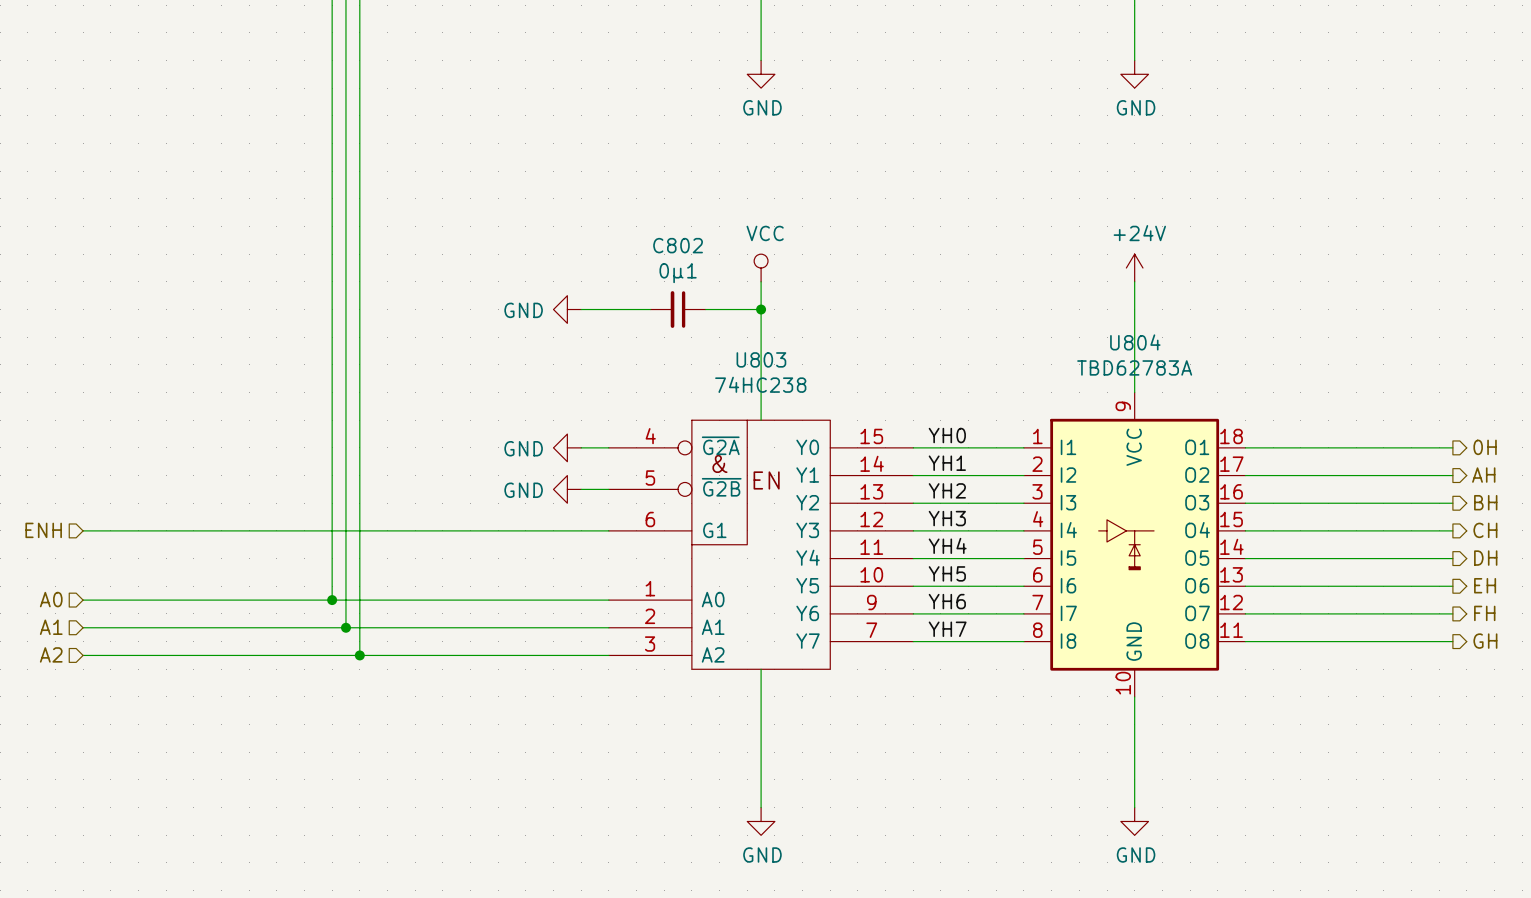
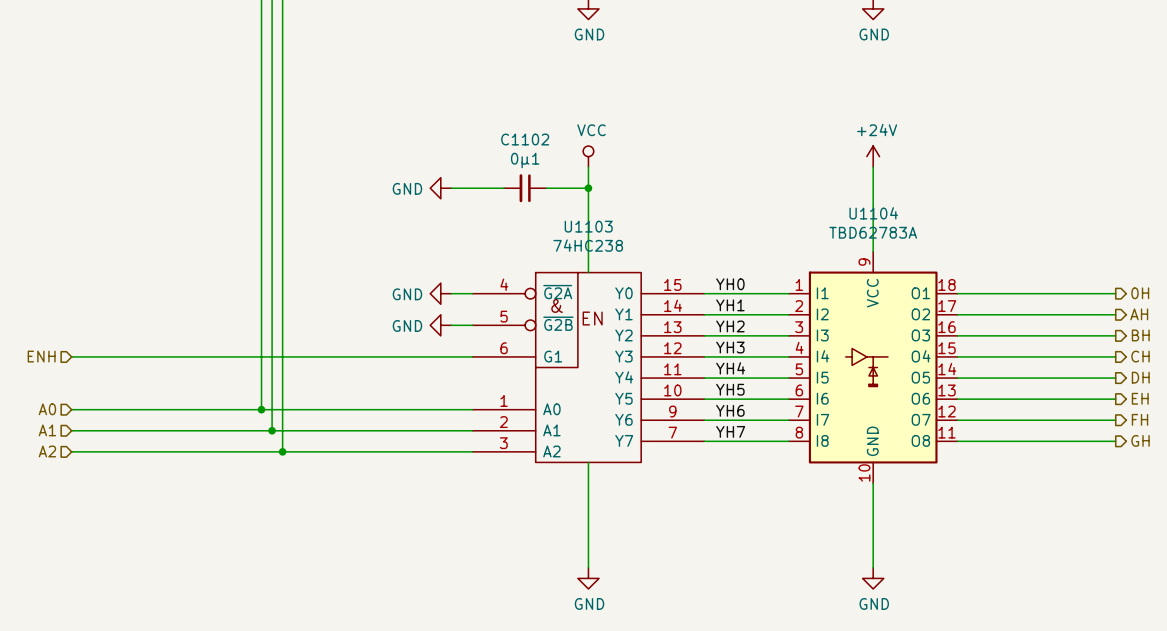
C802 name: C802 (678, 245) -> C1102 (525, 139)
U804 name: U804 (1135, 342) -> U1104 (873, 213)
U803 name: U803 (761, 359) -> U1103 (588, 226)

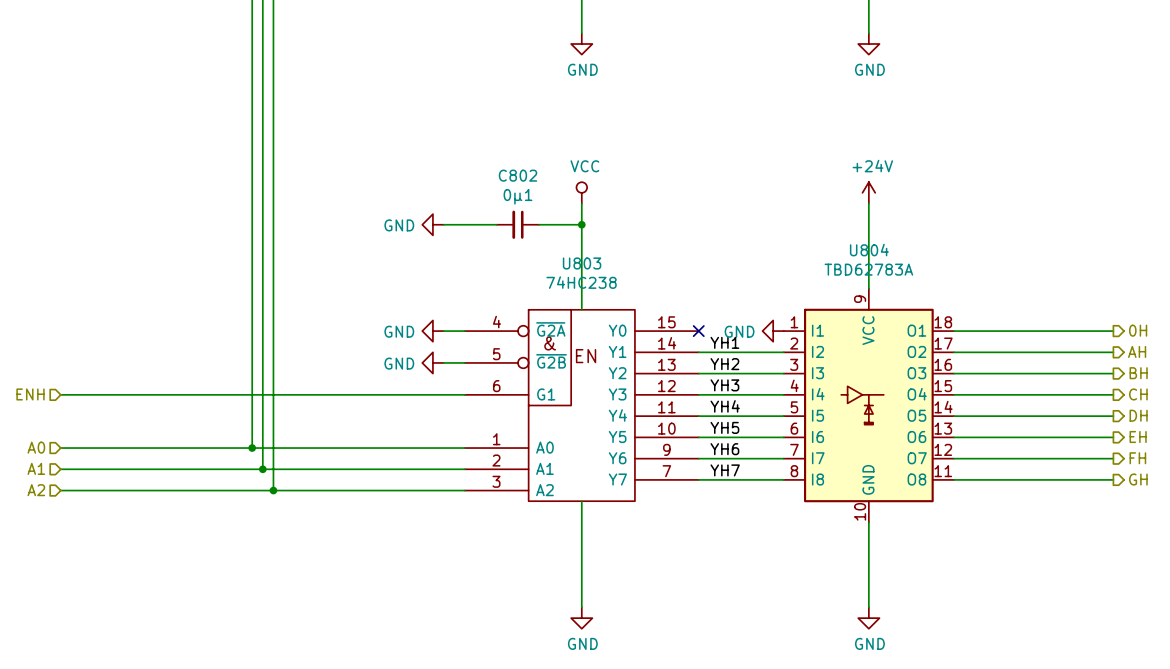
C1102 name: C1102 (525, 139) -> C802 (518, 175)
U1104 name: U1104 (873, 213) -> U804 (869, 250)
U1103 name: U1103 (588, 226) -> U803 (582, 263)
label: YH0 (730, 284) -> none
wire: (704, 293) (788, 293) -> none
no-connect mark: none -> (698, 331)
power symbol: none -> GND (773, 331)

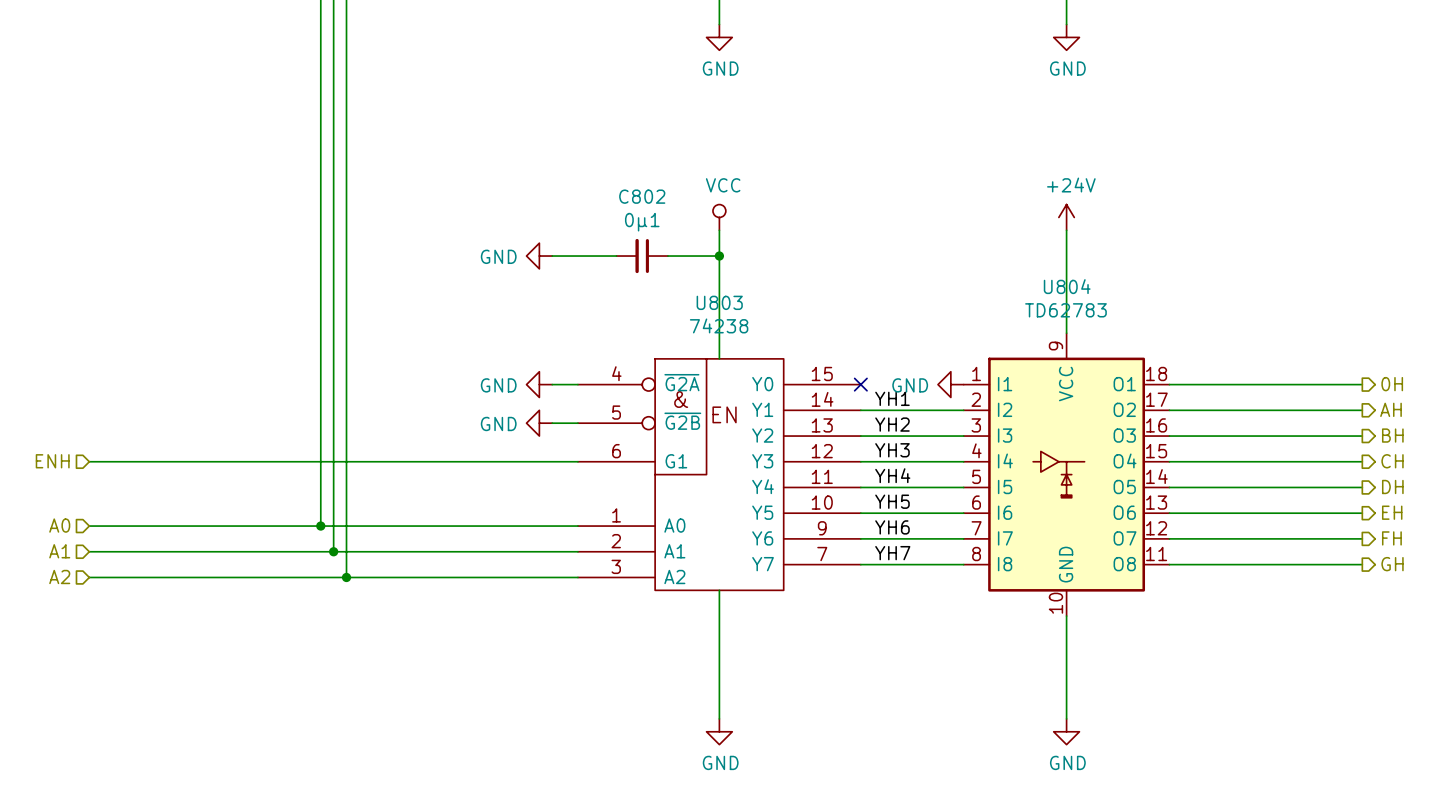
U804 value: TBD62783A (868, 269) -> TD62783 (1065, 310)
U803 value: 74HC238 (581, 282) -> 74238 (719, 325)

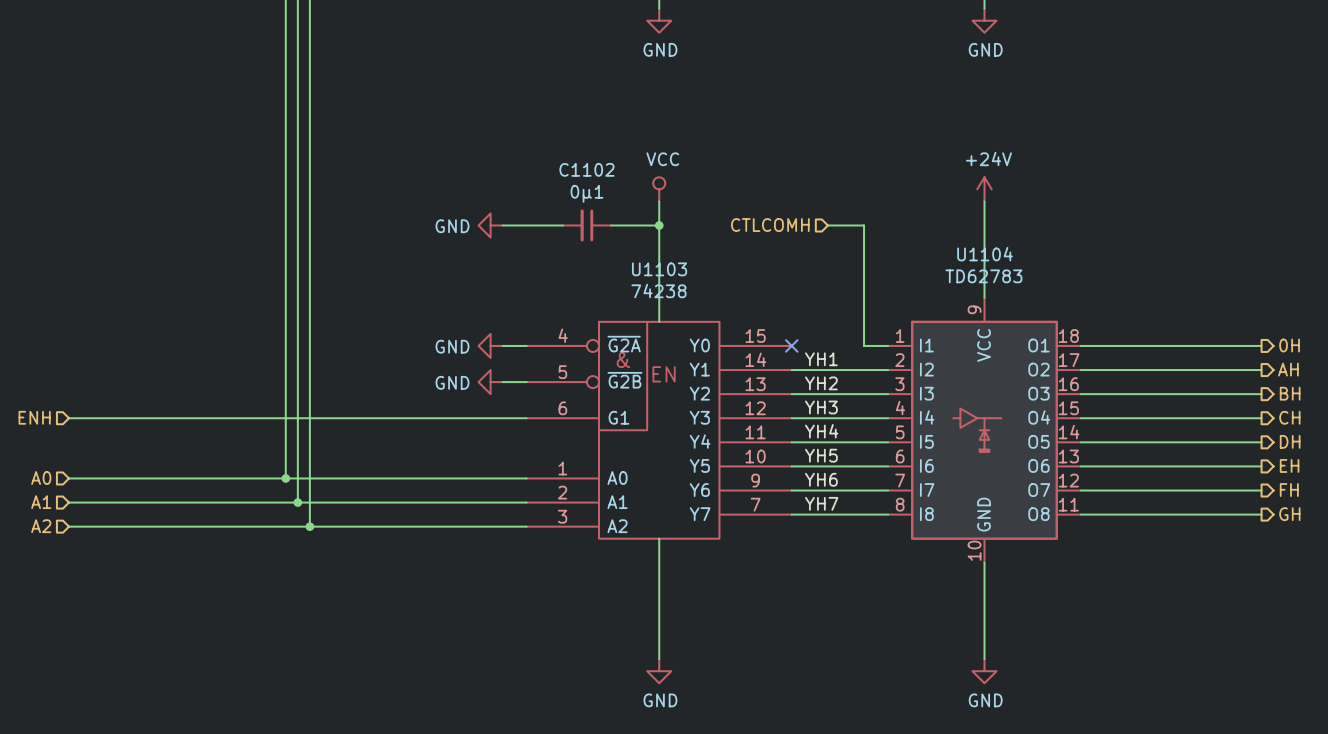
C802 name: C802 (642, 196) -> C1102 (586, 169)
hierarchical label: none -> CTLCOMH (770, 225)
wire: none -> (827, 225) (864, 225) (864, 345) (888, 345)
U804 name: U804 (1067, 286) -> U1104 (985, 254)
U803 name: U803 (719, 302) -> U1103 (659, 269)
power symbol: GND (950, 384) -> none

